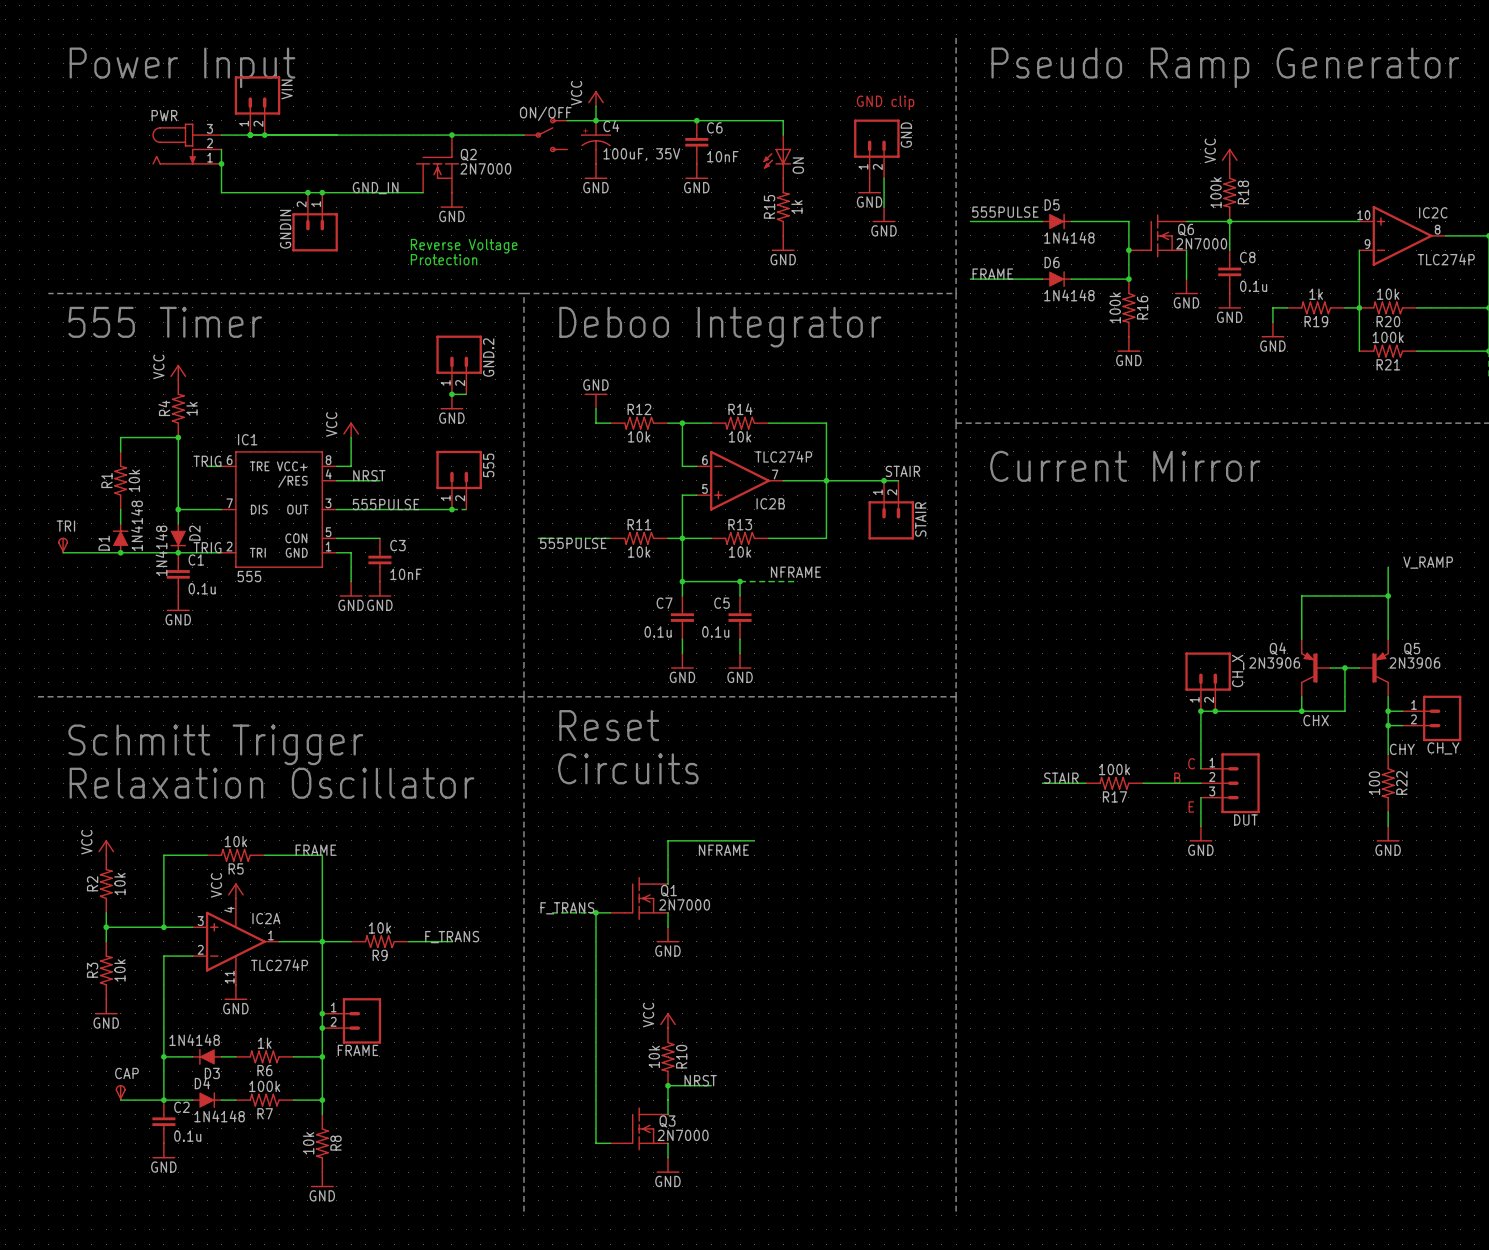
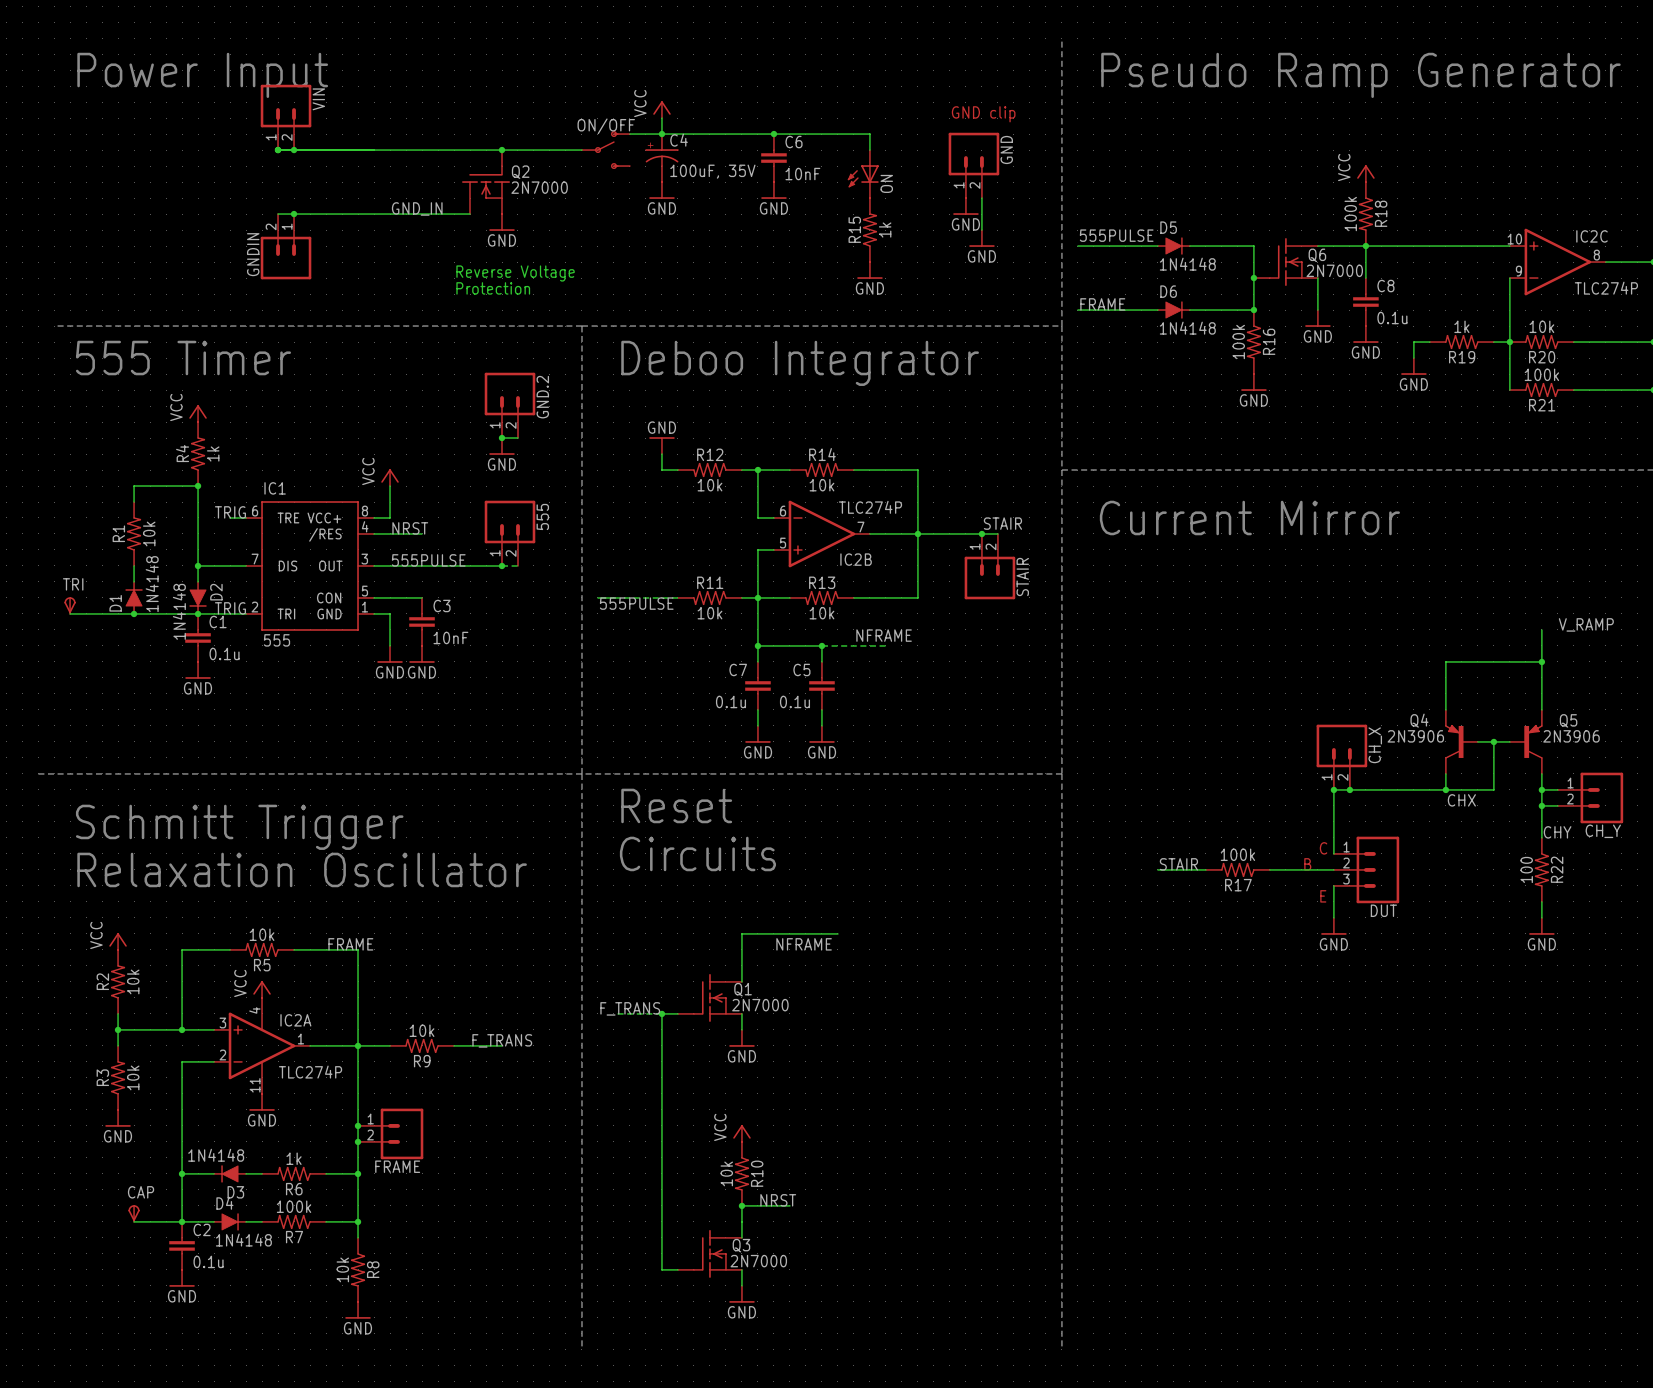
wire: (221, 135) (250, 135) -> none
PWR: (187, 144) -> none
wire: (221, 149) (221, 192) (250, 192) -> none
junction: (221, 163) -> none
junction: none -> (294, 214)
junction: (307, 192) -> none
junction: (322, 192) -> none
GNDIN position: (315, 222) -> (286, 246)

